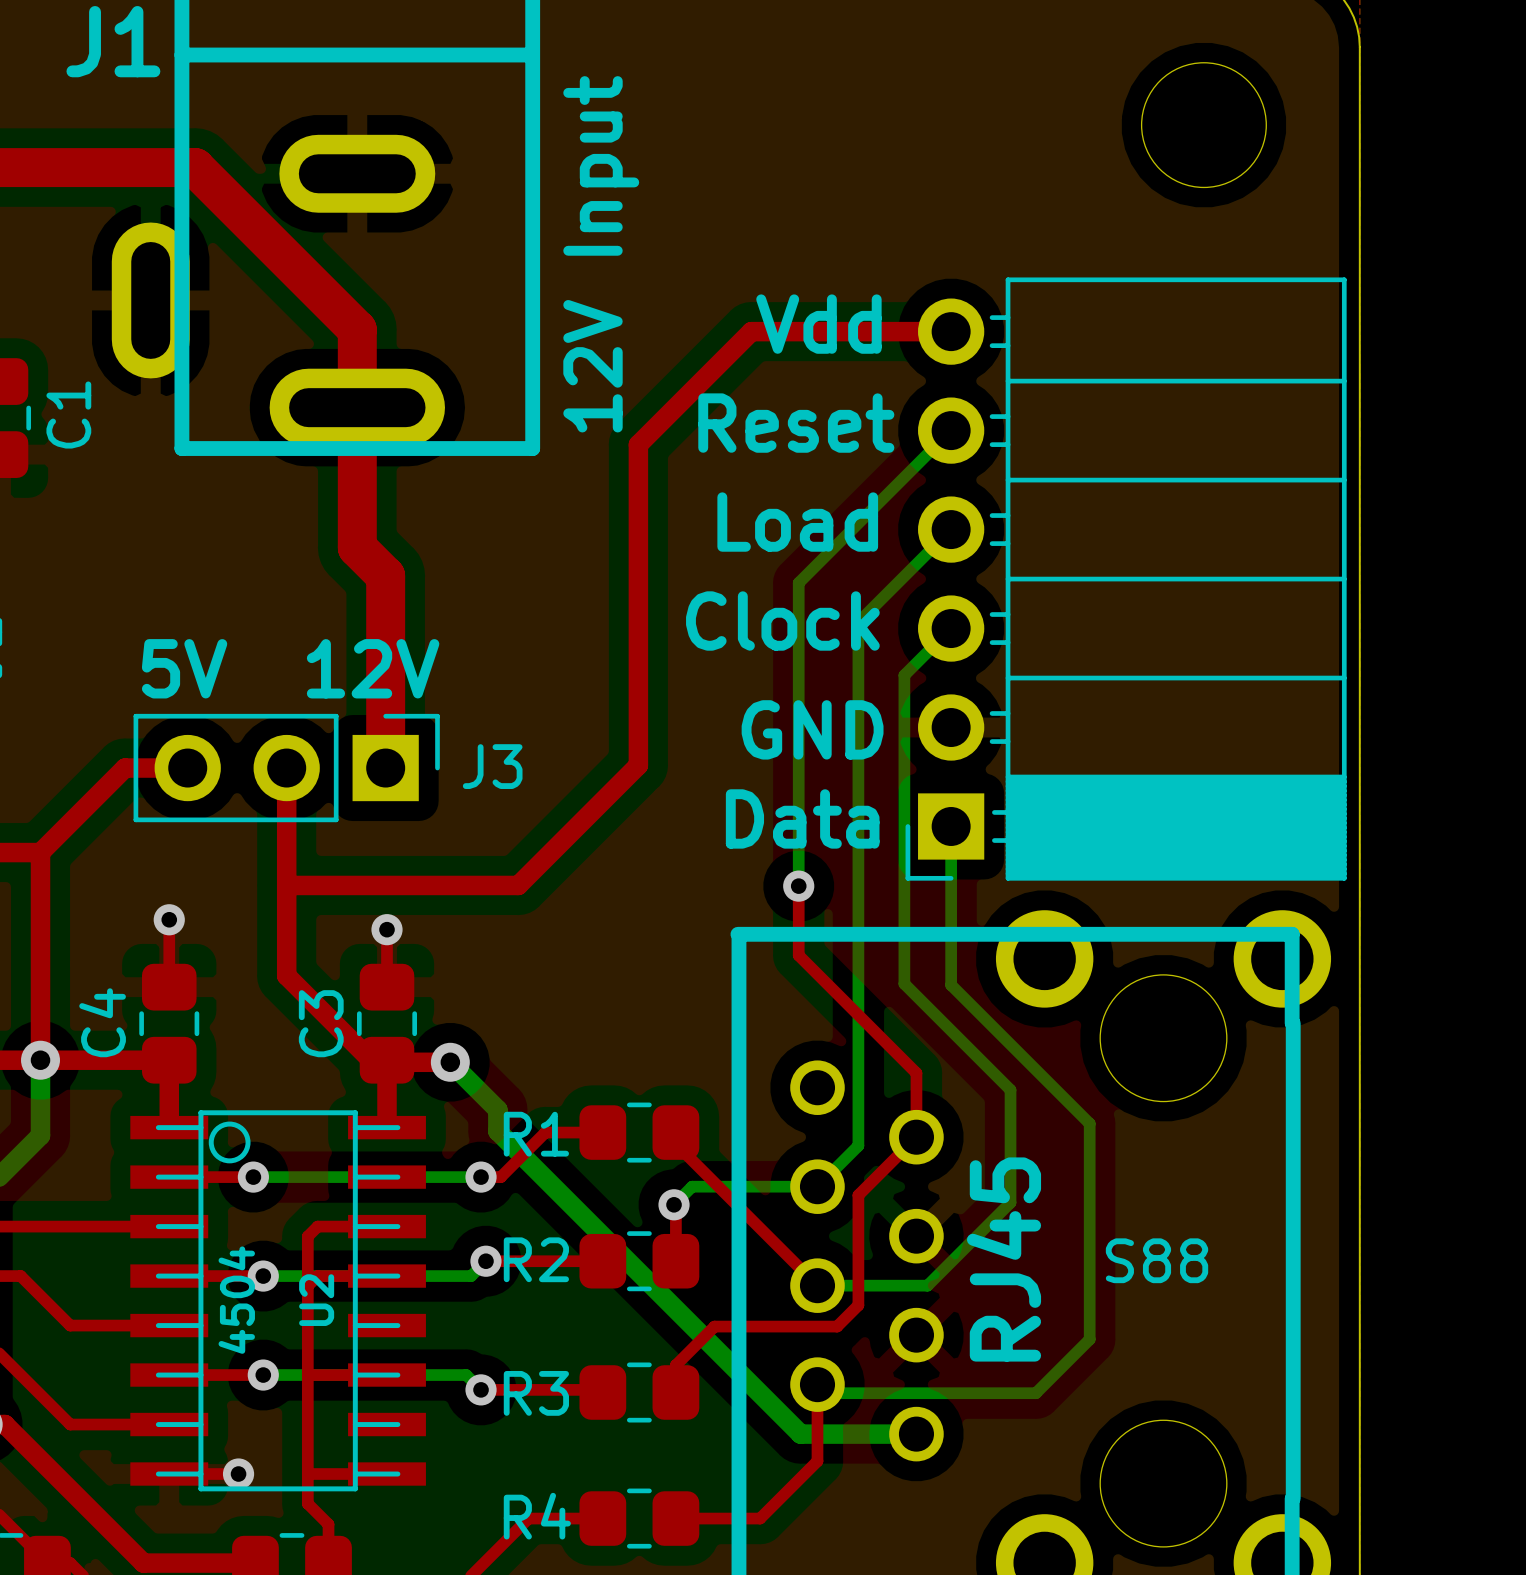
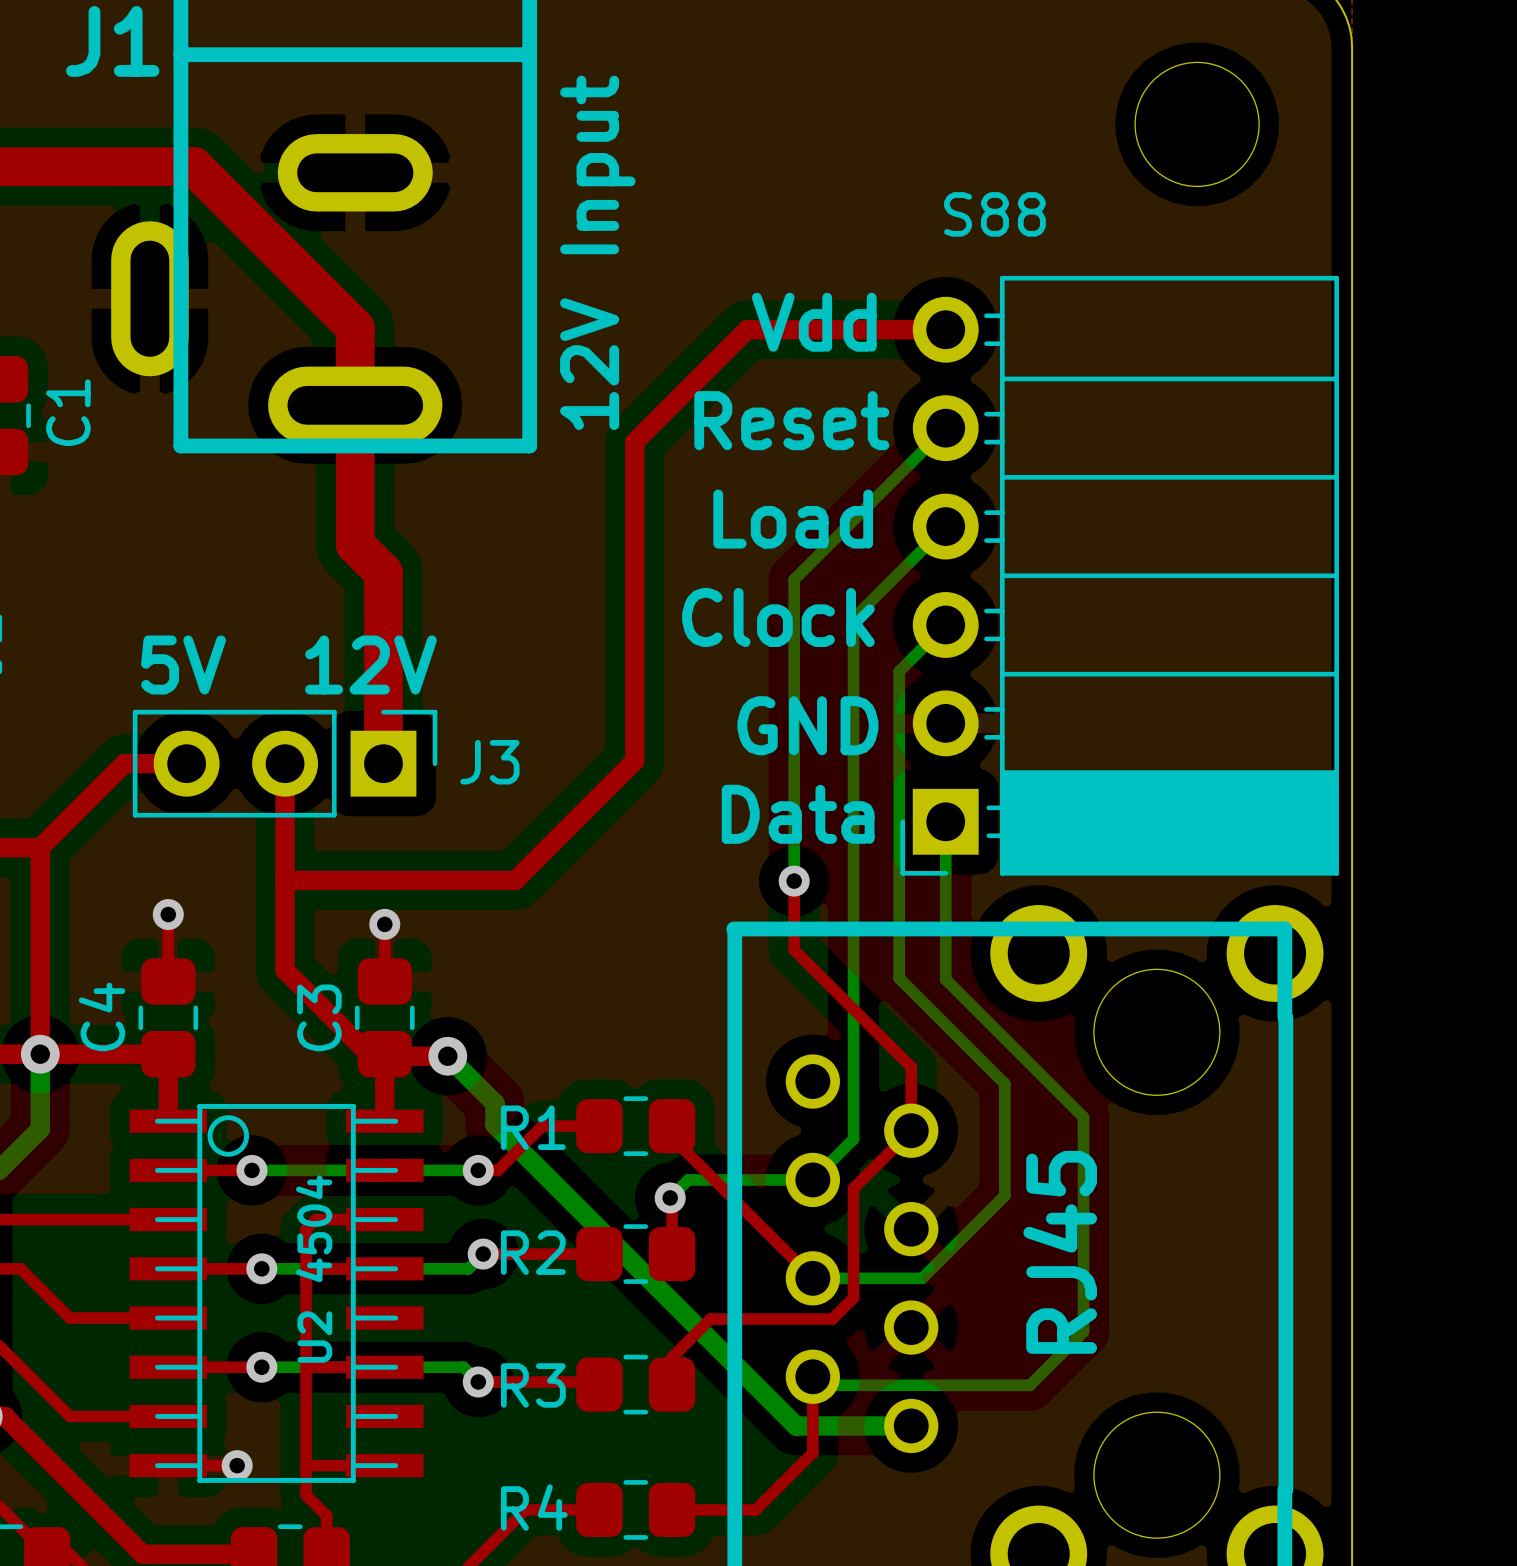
part value position: RJ45 (1004, 1259) -> RJ45 (1060, 1252)
S88 name position: S88 (1157, 1260) -> S88 (994, 214)
U2 value position: 4504 (236, 1300) -> 4504 (314, 1228)
U2 name position: U2 (316, 1300) -> U2 (314, 1337)

